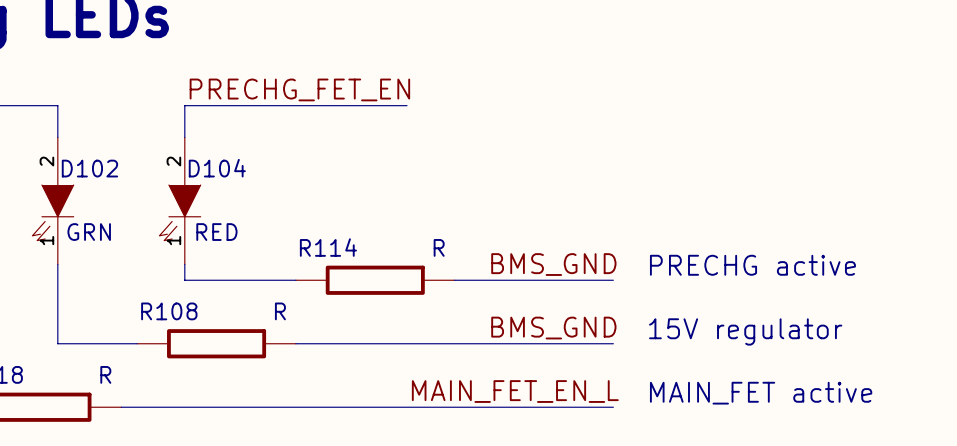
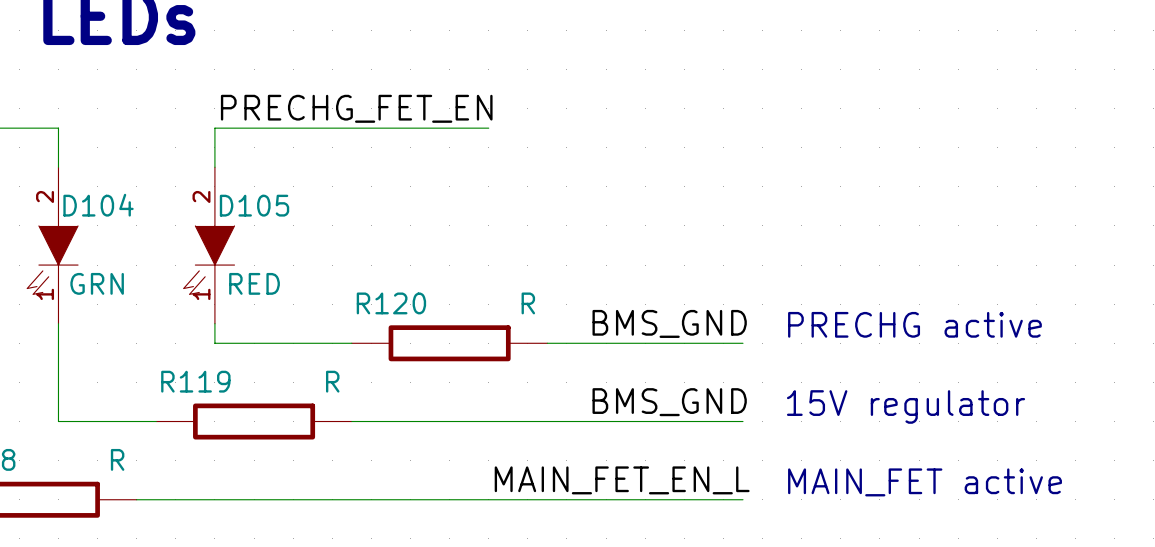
D102 name: D102 (89, 168) -> D104 (98, 205)
D104 name: D104 (217, 168) -> D105 (254, 205)
R114 name: R114 (328, 247) -> R120 (391, 303)
R108 name: R108 (169, 311) -> R119 (195, 381)

